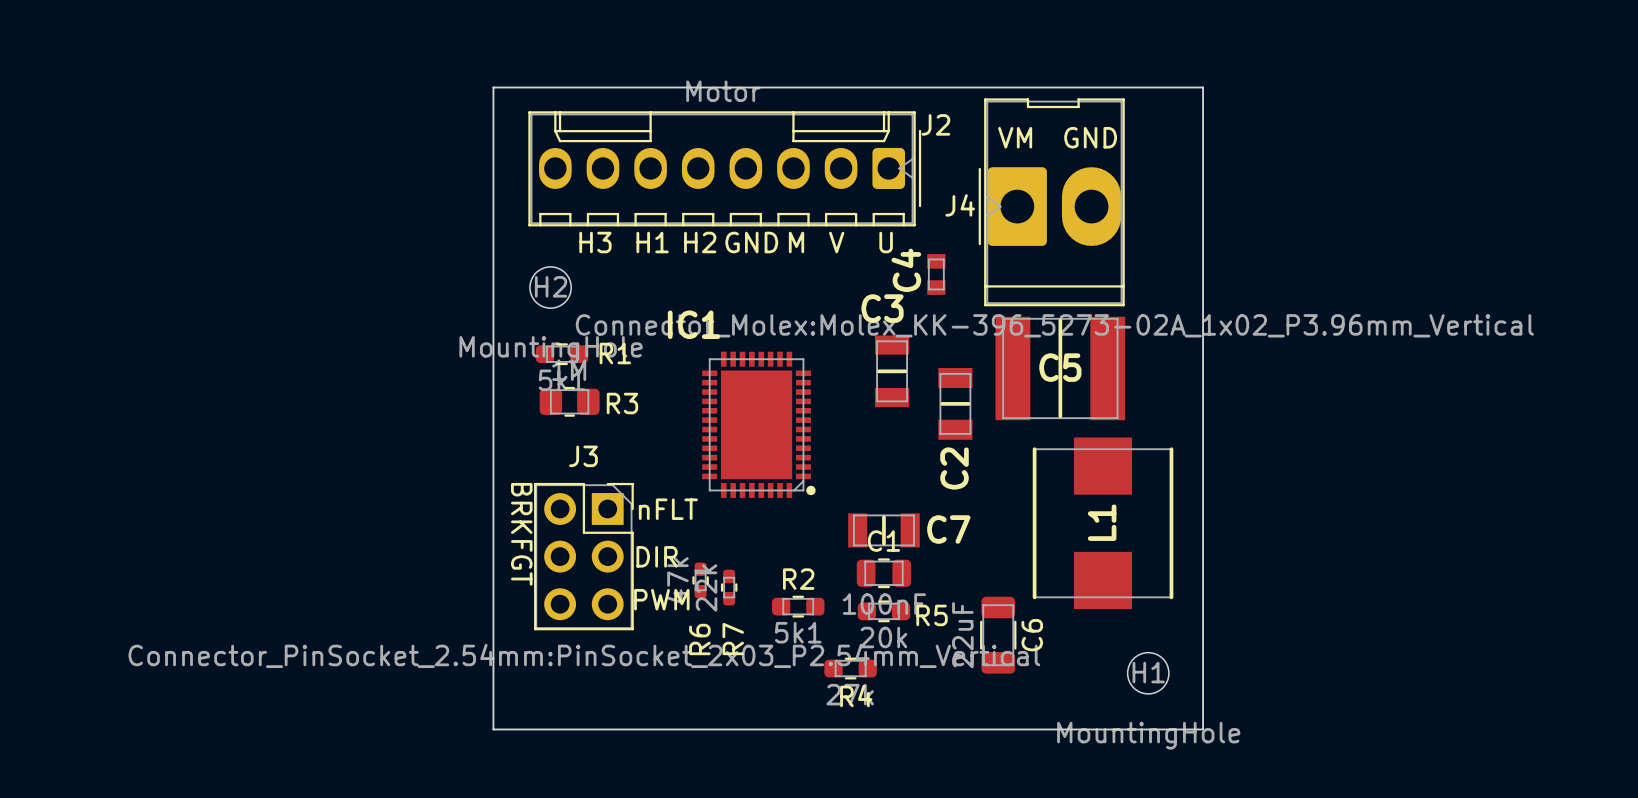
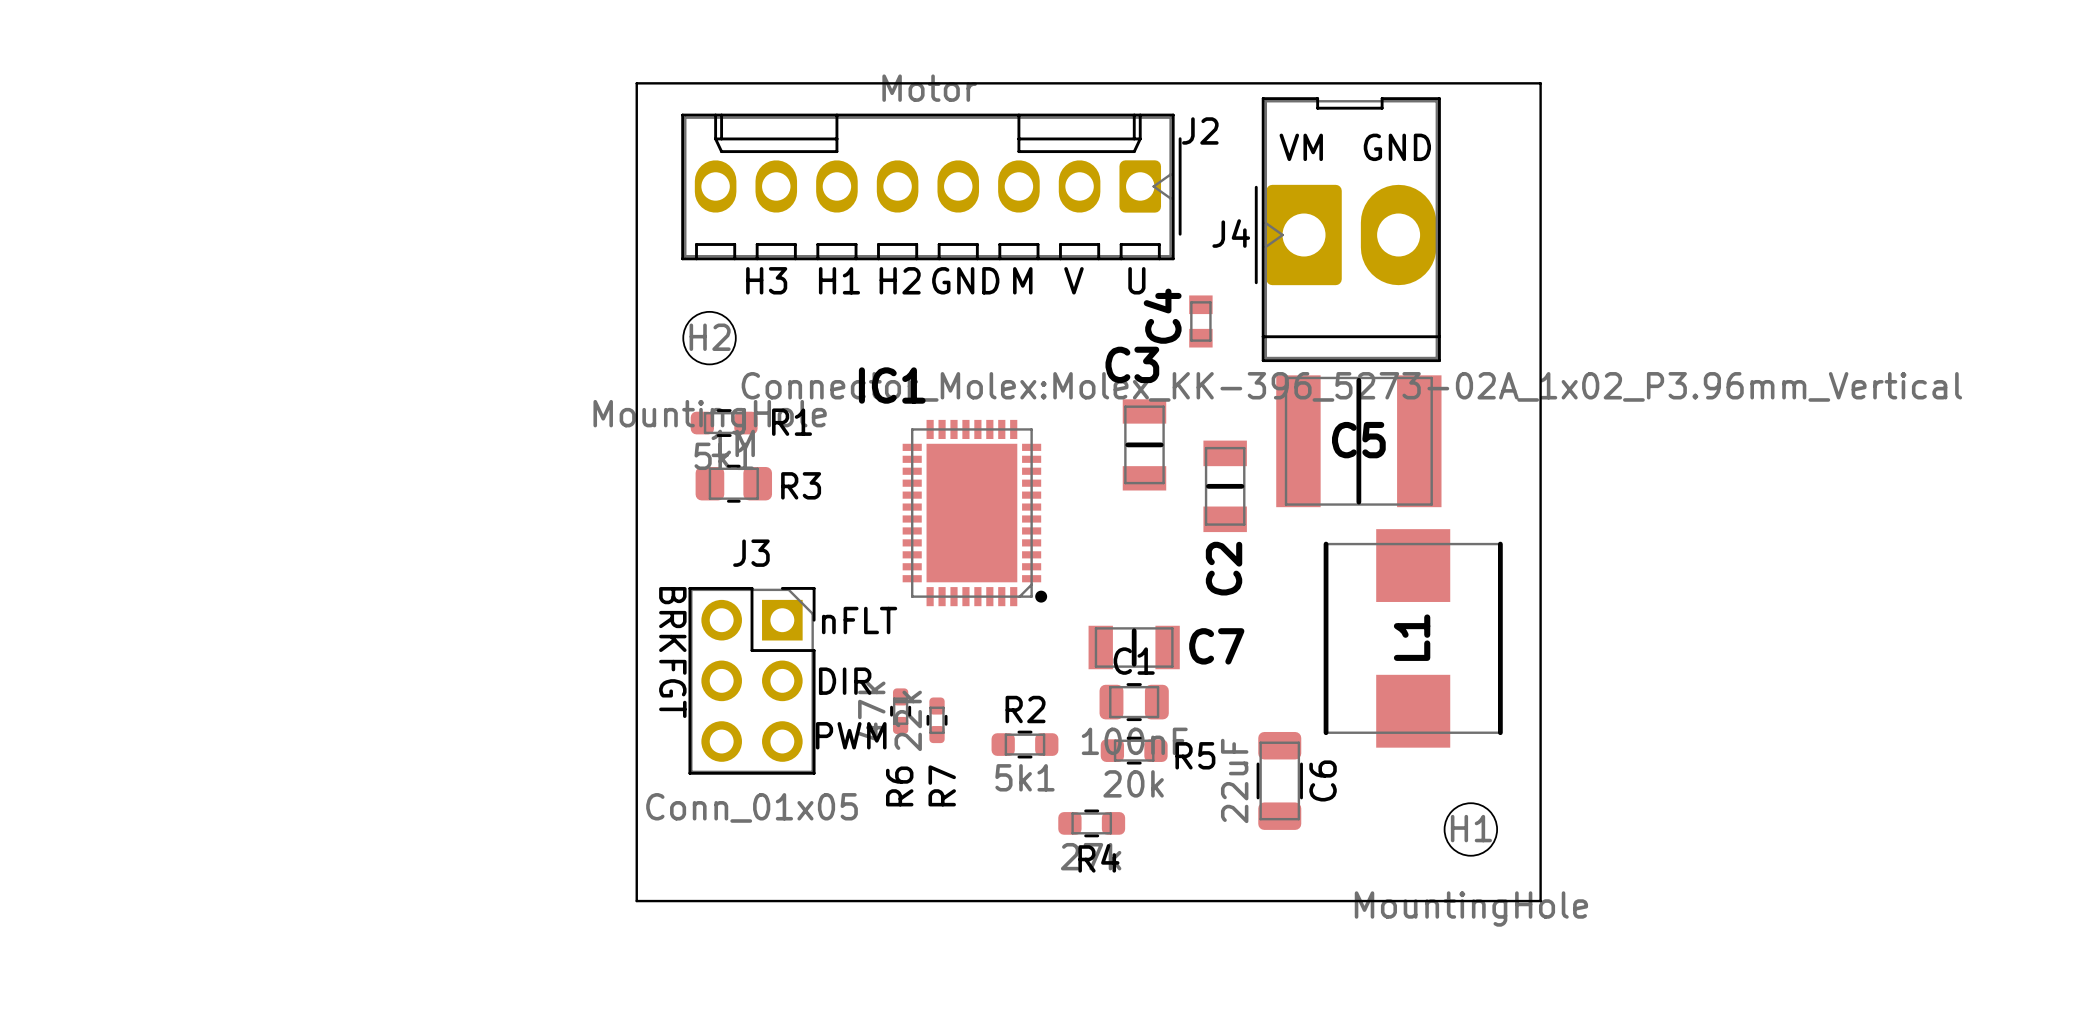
J3 value: Connector_PinSocket_2.54mm:PinSocket_2x03_P2.54mm_Vertical (584, 655) -> Conn_01x05 (752, 807)

